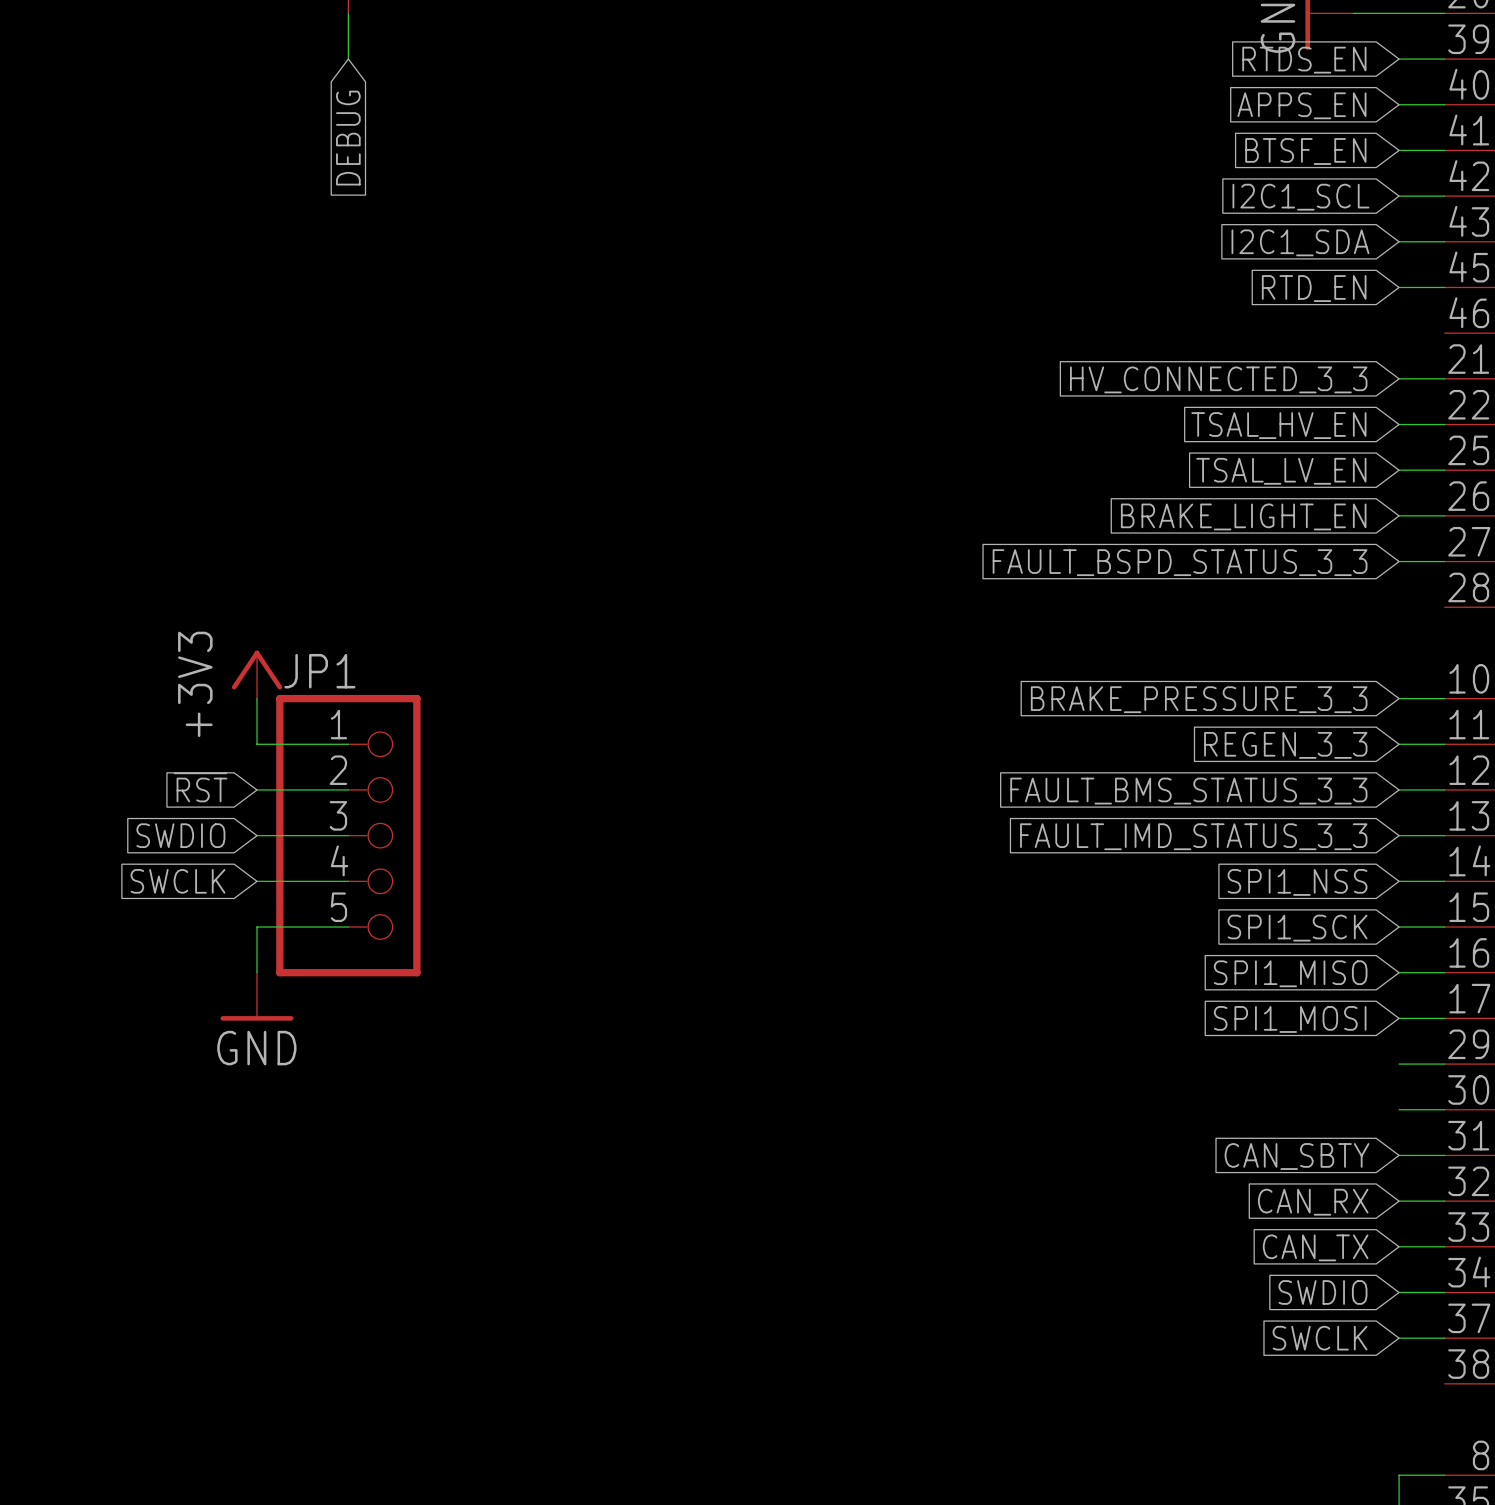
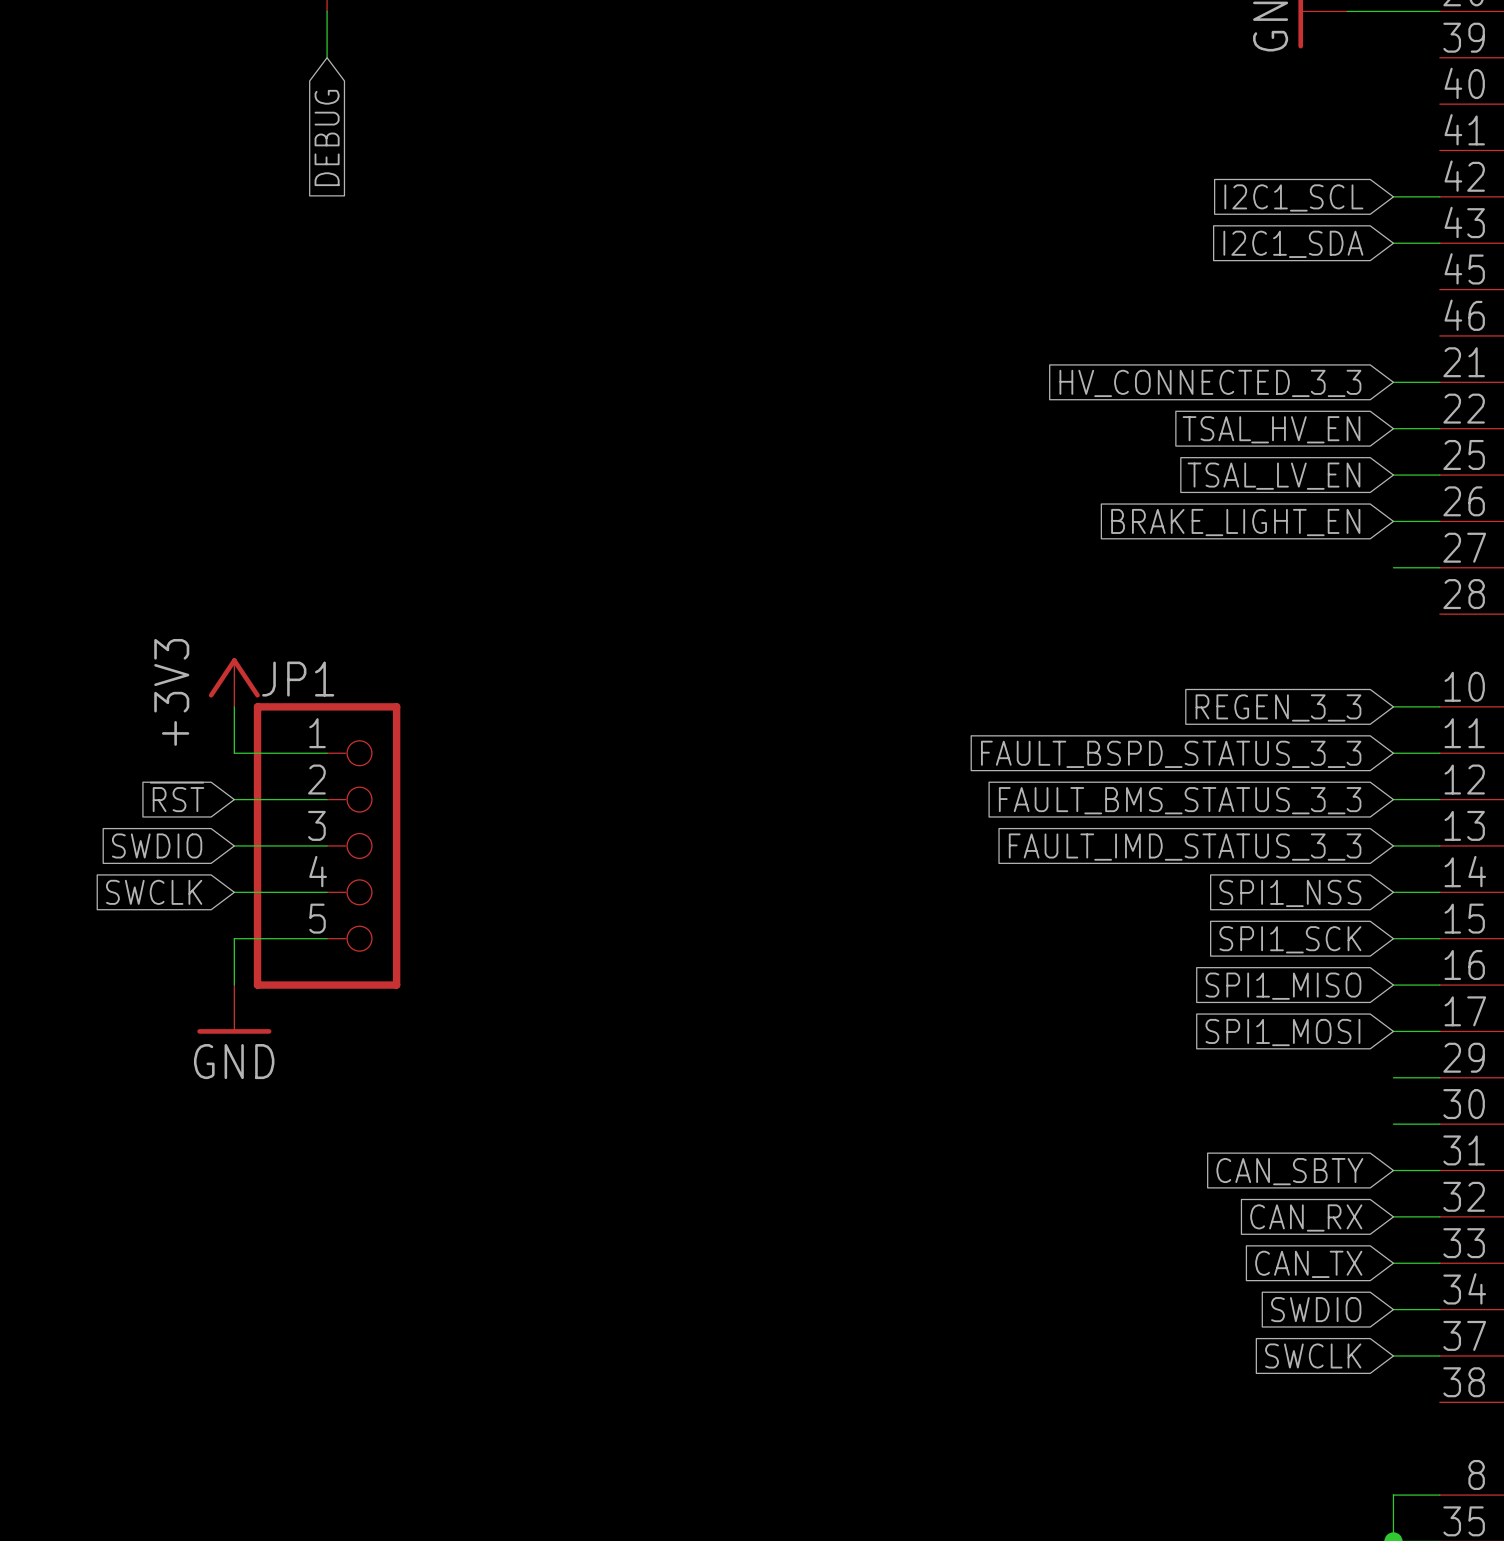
wire: (1399, 59) (1444, 59) -> none
global label: RTDS_EN (1304, 60) -> none
wire: (1399, 104) (1444, 104) -> none
global label: APPS_EN (1301, 105) -> none
wire: (1399, 150) (1444, 150) -> none
global label: BTSF_EN (1305, 151) -> none
wire: (1399, 287) (1444, 287) -> none
global label: RTD_EN (1314, 288) -> none
global label: FAULT_BSPD_STATUS_3_3 (1180, 562) -> none
global label: BRAKE_PRESSURE_3_3 (1199, 699) -> REGEN_3_3 (1278, 707)
global label: REGEN_3_3 (1285, 745) -> FAULT_BSPD_STATUS_3_3 (1171, 754)

